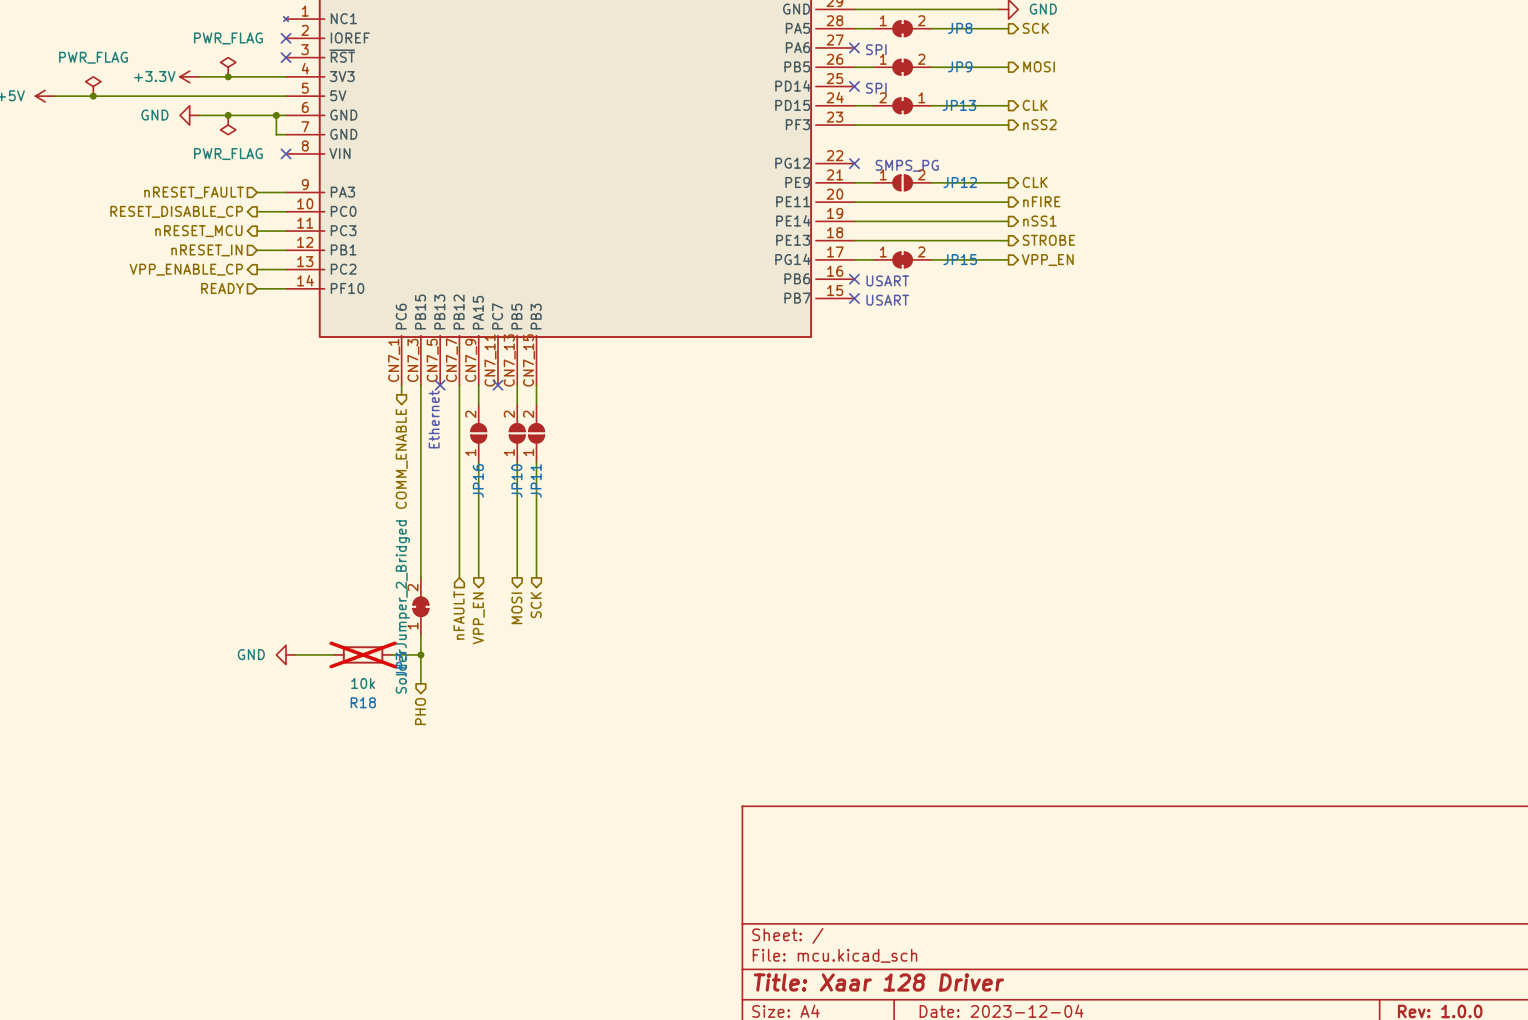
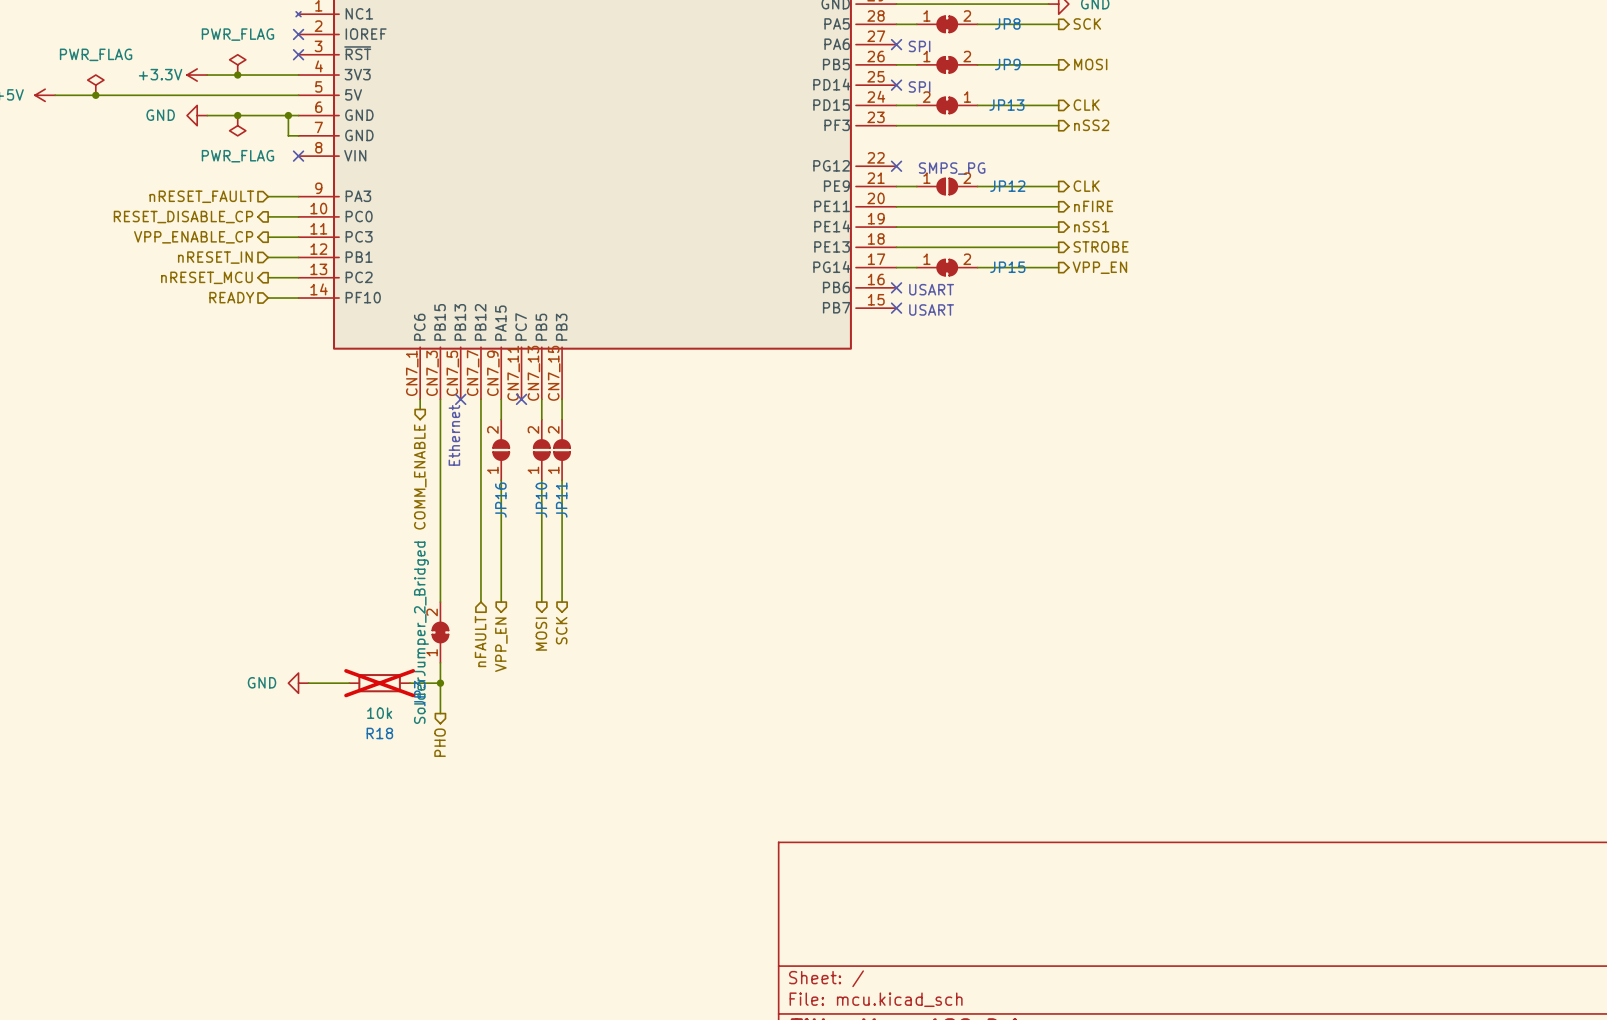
hierarchical label: nRESET_MCU (198, 231) -> VPP_ENABLE_CP (193, 237)
hierarchical label: VPP_ENABLE_CP (186, 269) -> nRESET_MCU (206, 277)

